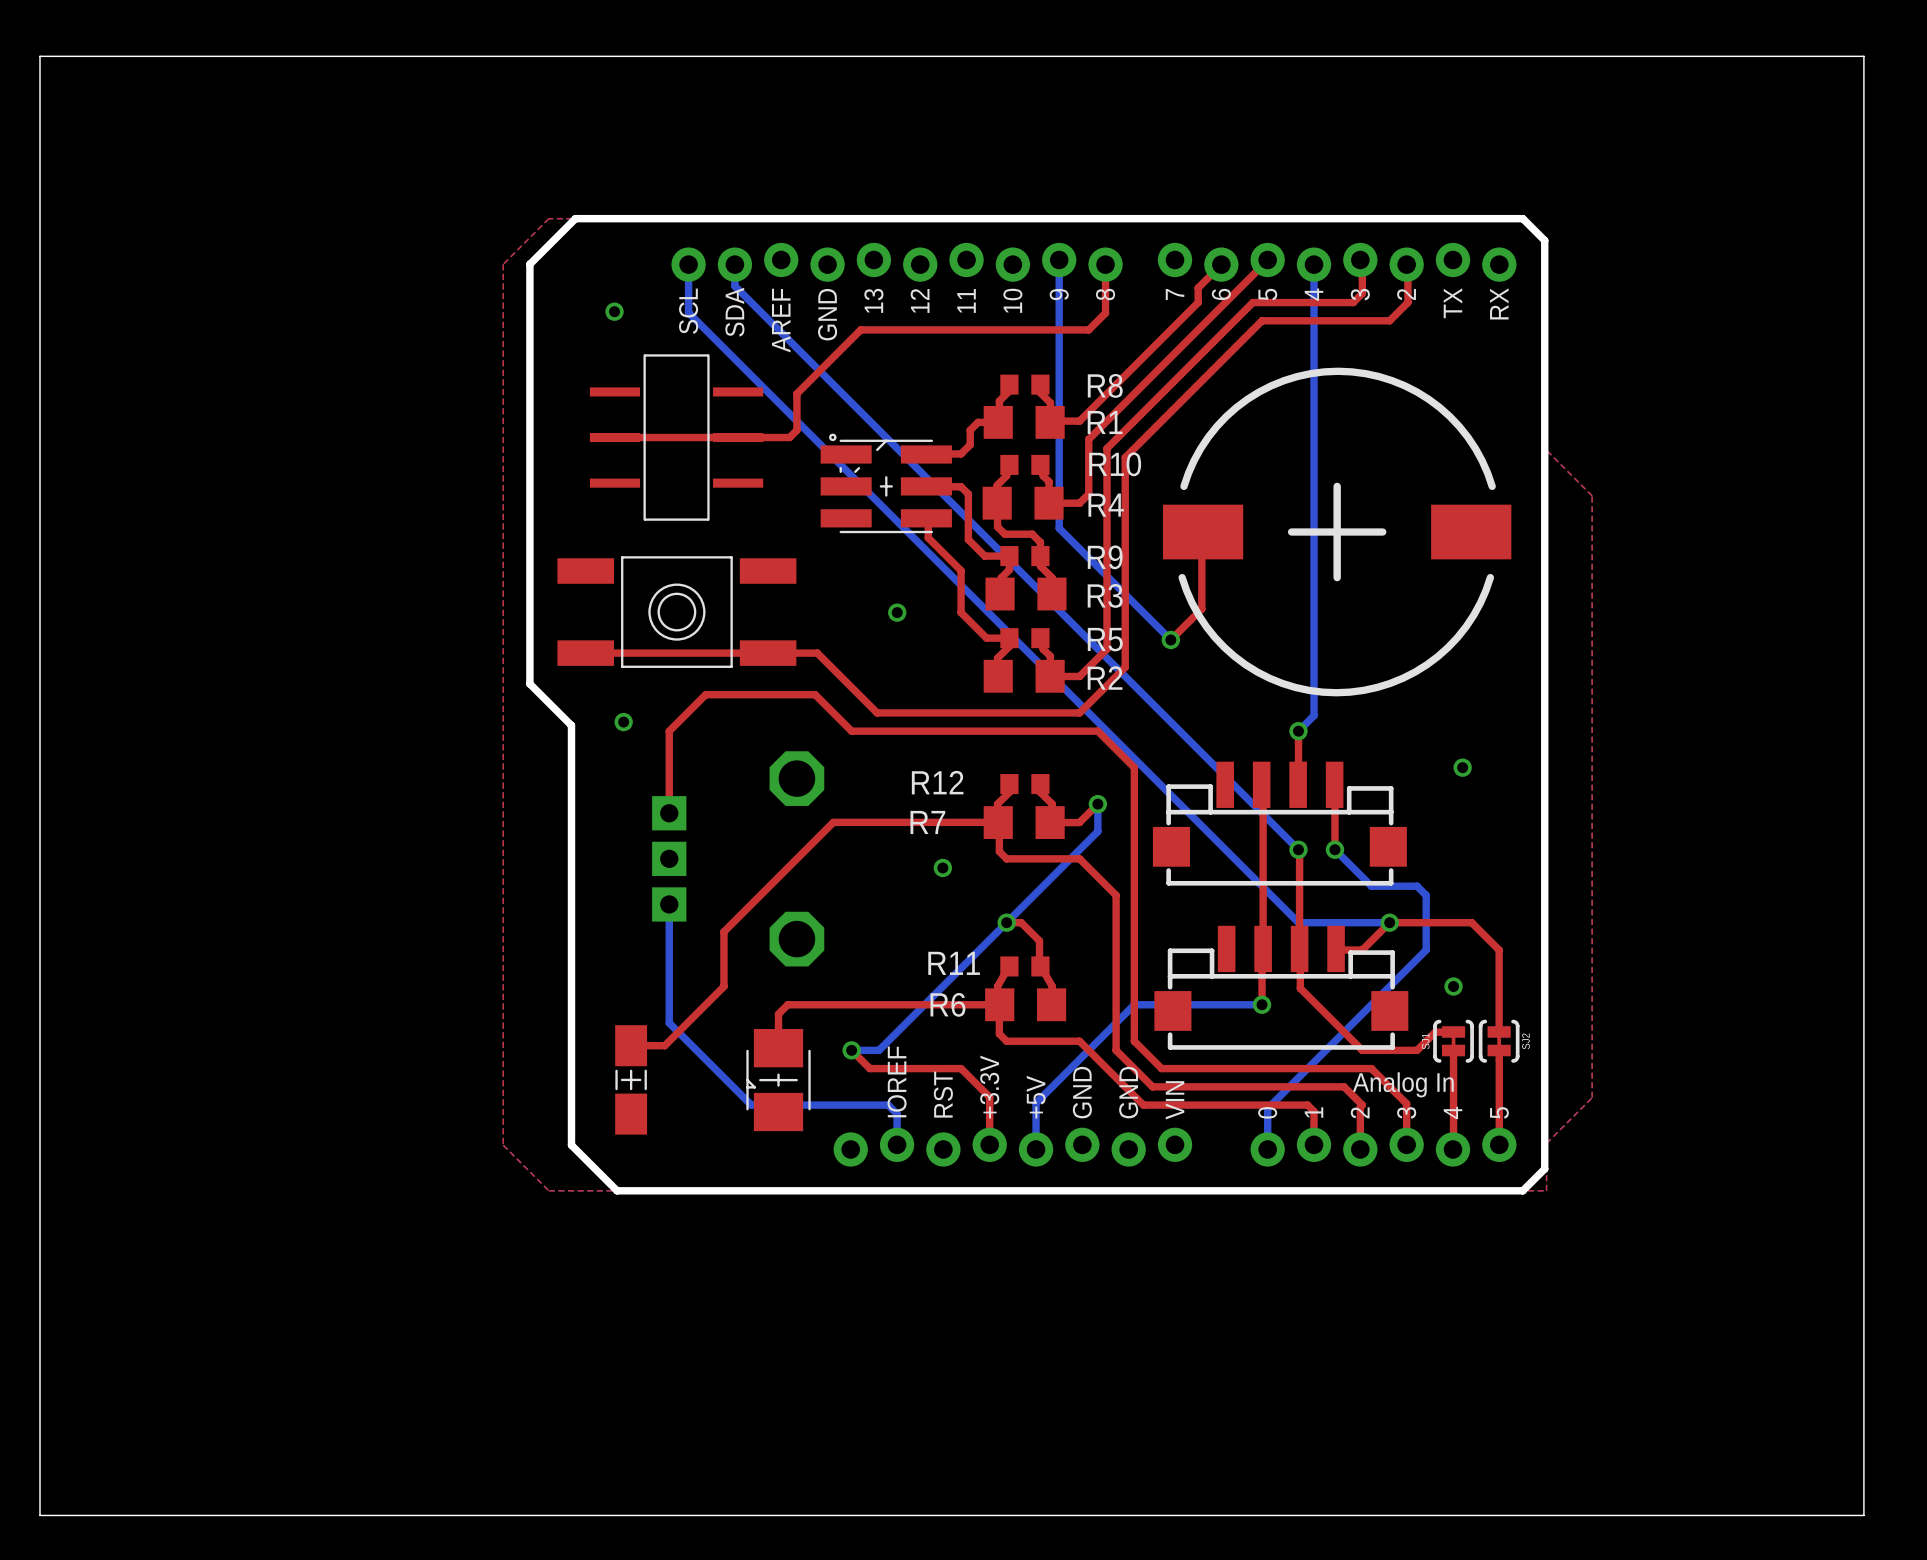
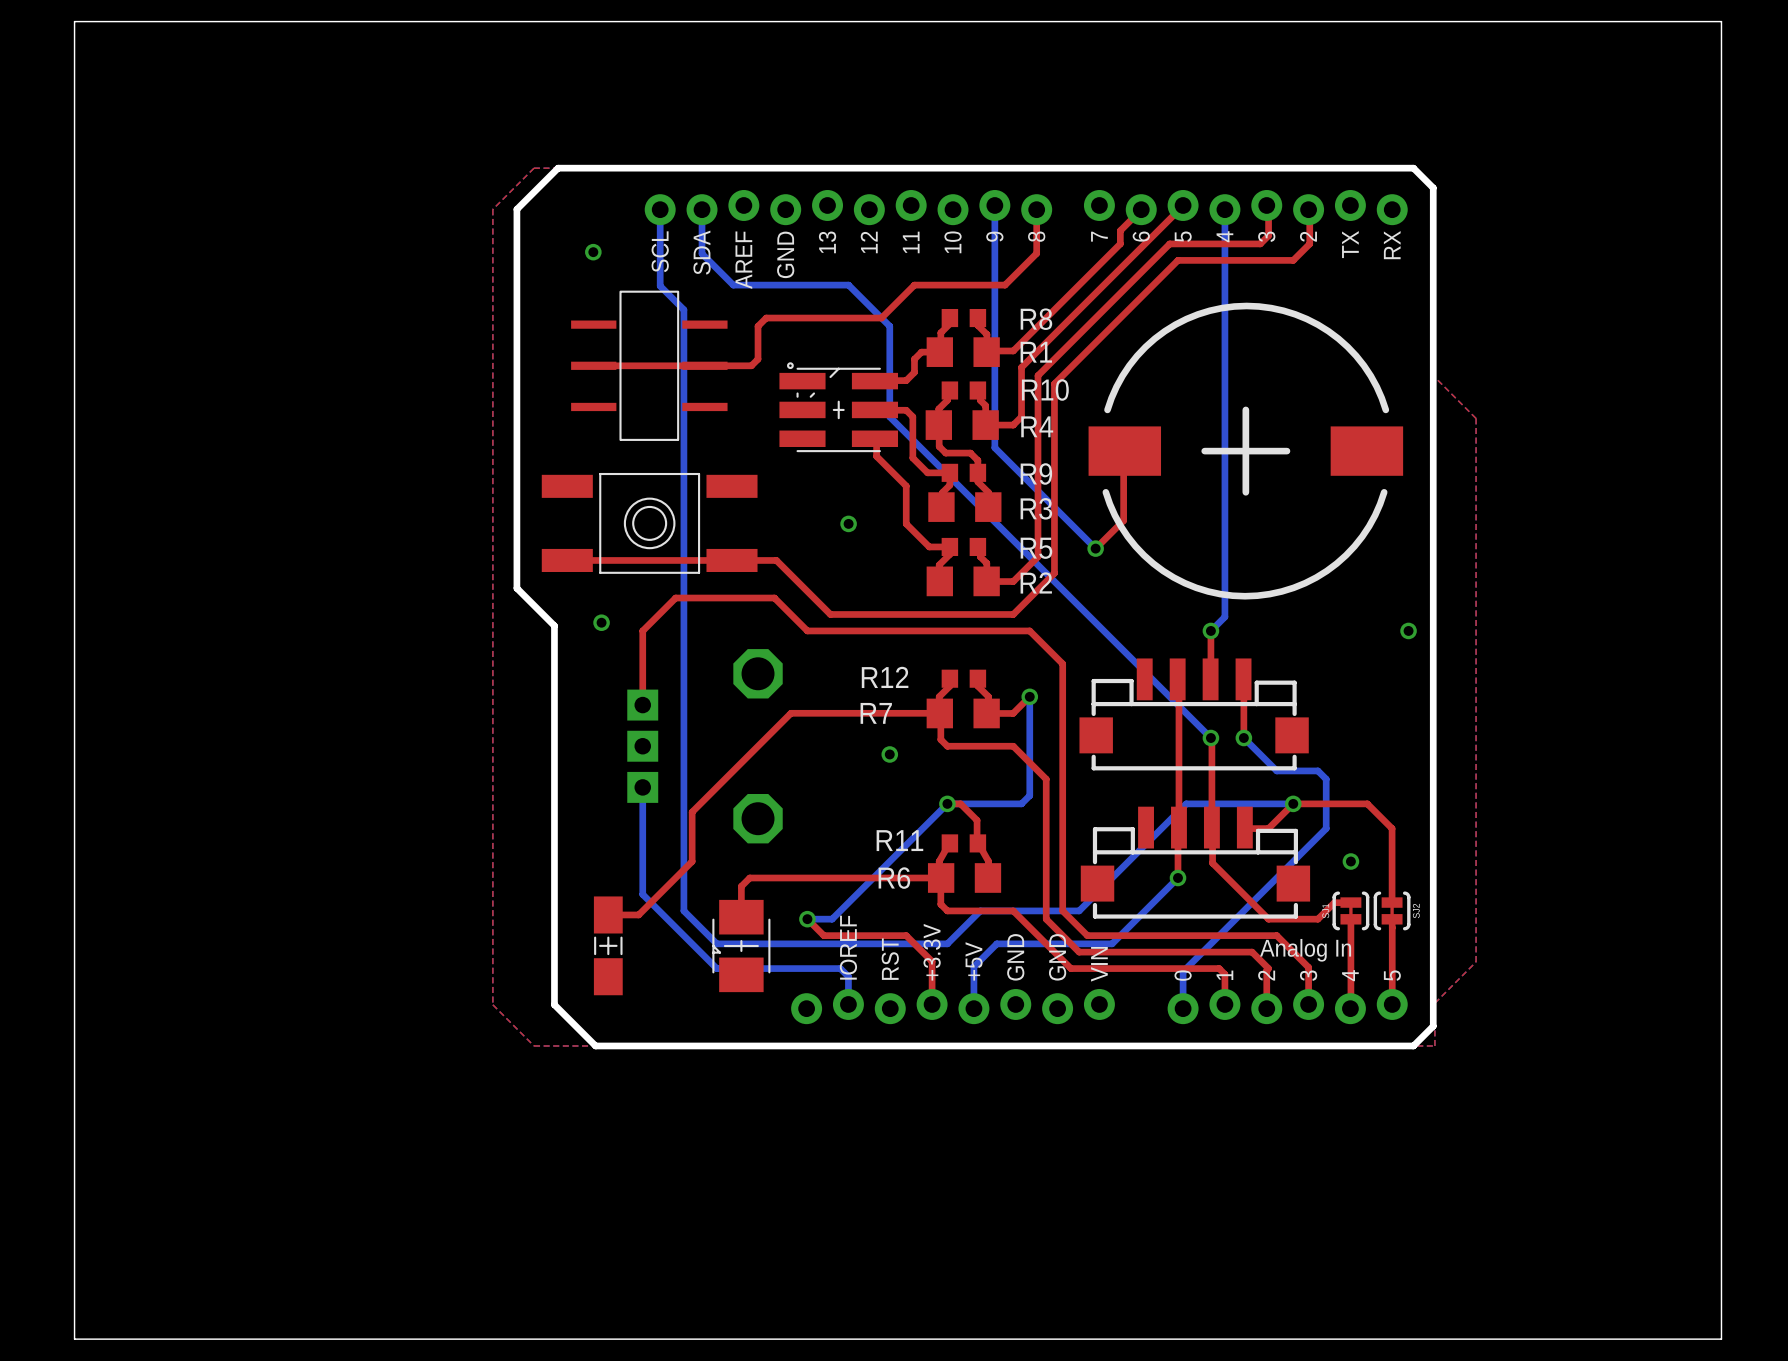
bottom track: (734, 286) (942, 494) -> (702, 229) (702, 253) (733, 285) (848, 285) (889, 326) (889, 416)
bottom track: (688, 312) (1298, 922) -> (660, 253) (660, 286) (683, 309) (683, 910) (716, 943) (947, 943) (980, 910) (1079, 910) (1186, 803) (1210, 803)
top track: (1088, 329) (860, 329) (806, 384) -> (1021, 268) (1005, 285) (914, 285) (881, 318) (766, 318)
via position: (1462, 767) -> (1408, 630)
bottom track: (1097, 831) (1006, 922) -> (1029, 721) (1029, 795) (1021, 803) (947, 803)
bottom track: (1262, 1004) (1134, 1004) (1061, 1077) -> (1177, 877) (1112, 943) (996, 943)

